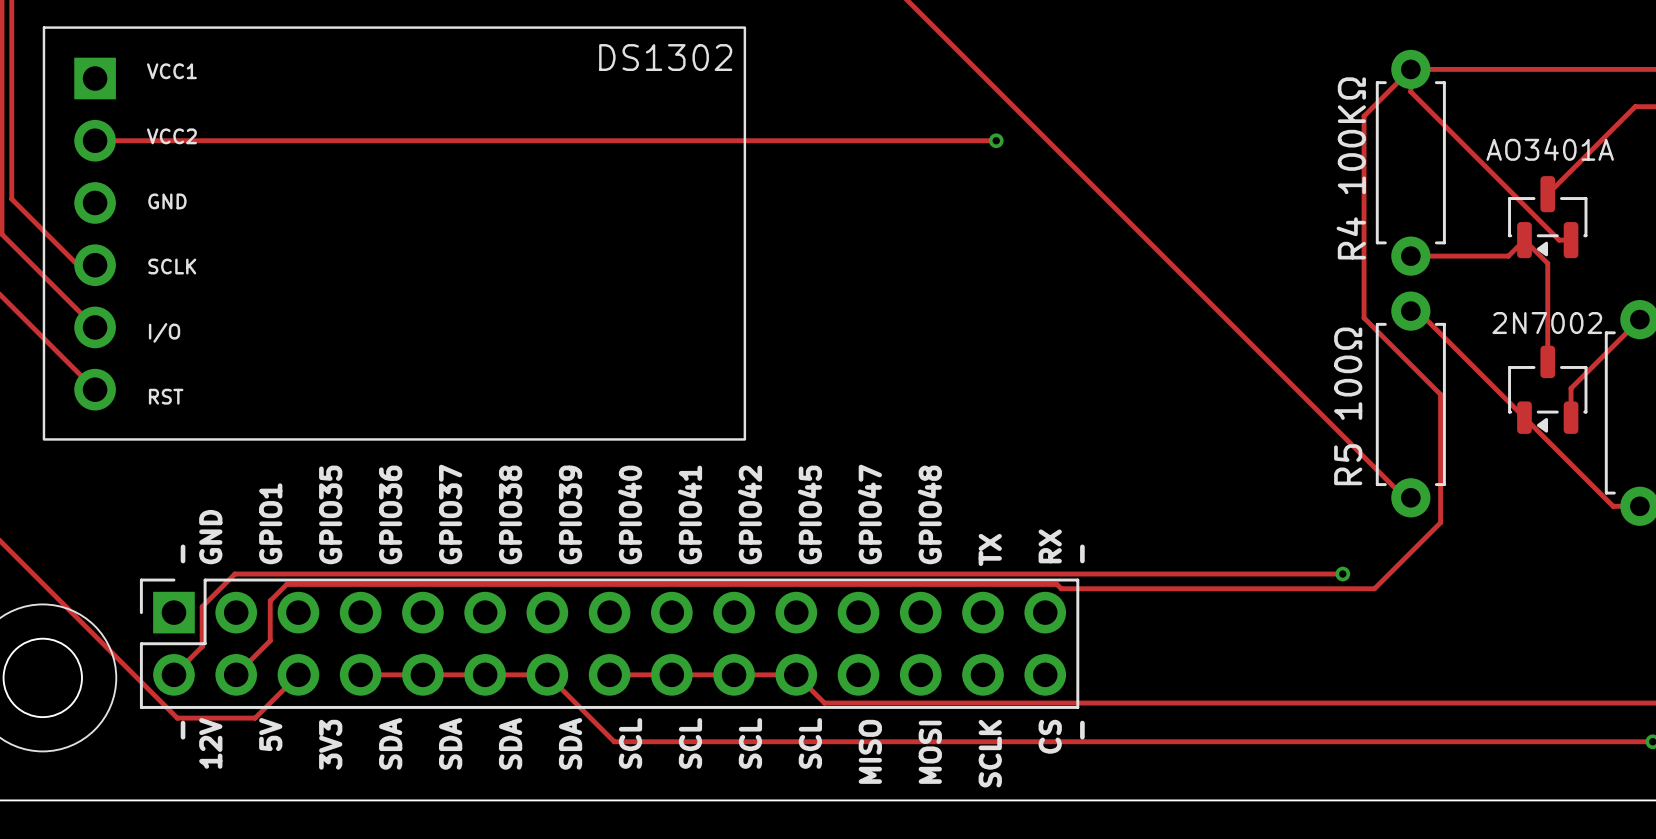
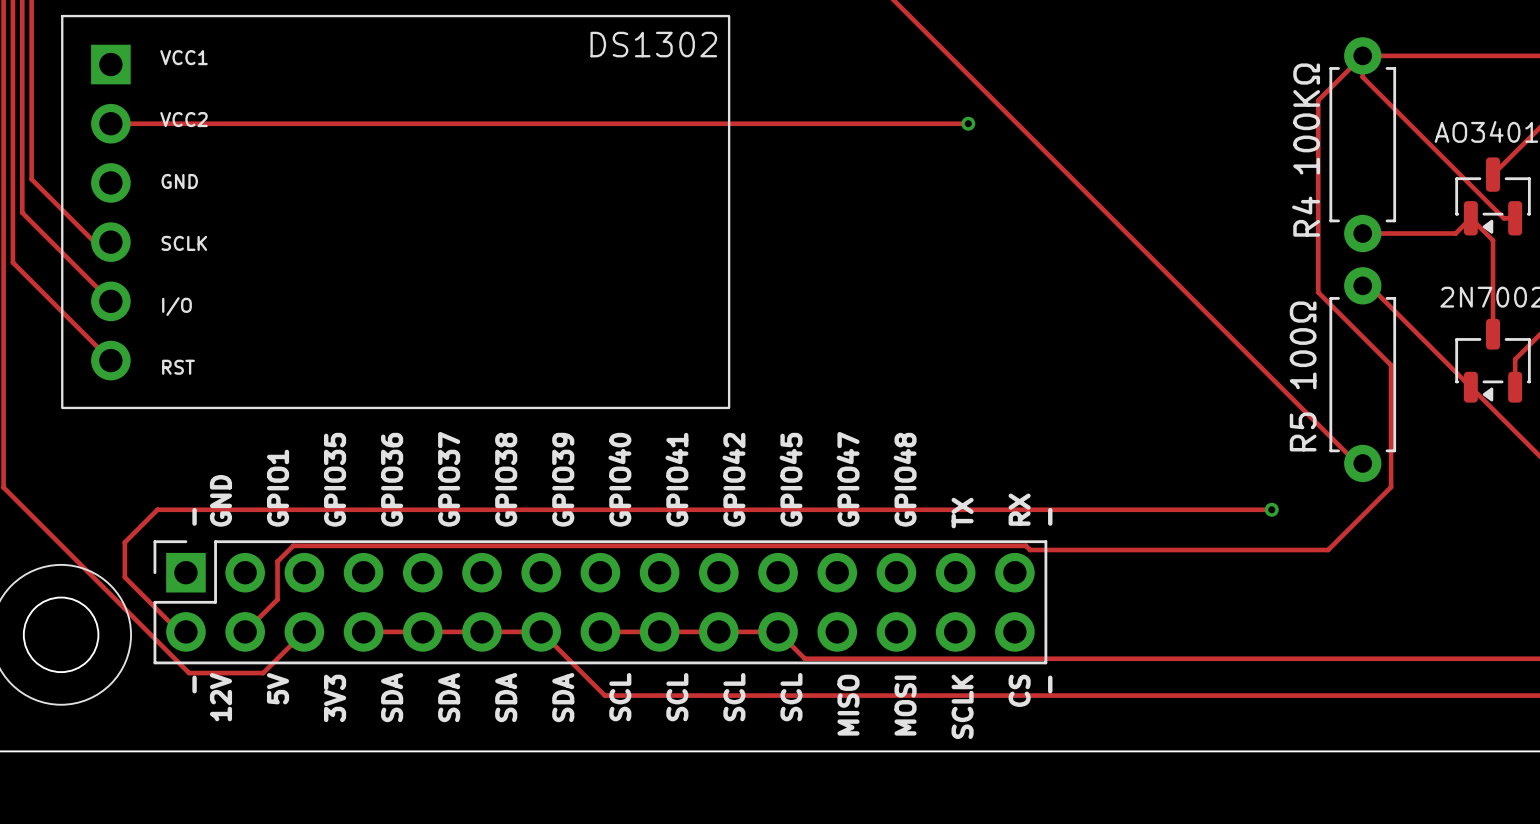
track: (1342, 574) (234, 574) (202, 606) (202, 646) (173, 674) -> (1271, 509) (157, 509) (124, 542) (124, 577) (179, 631) (185, 631)
via position: (1342, 574) -> (1271, 509)

